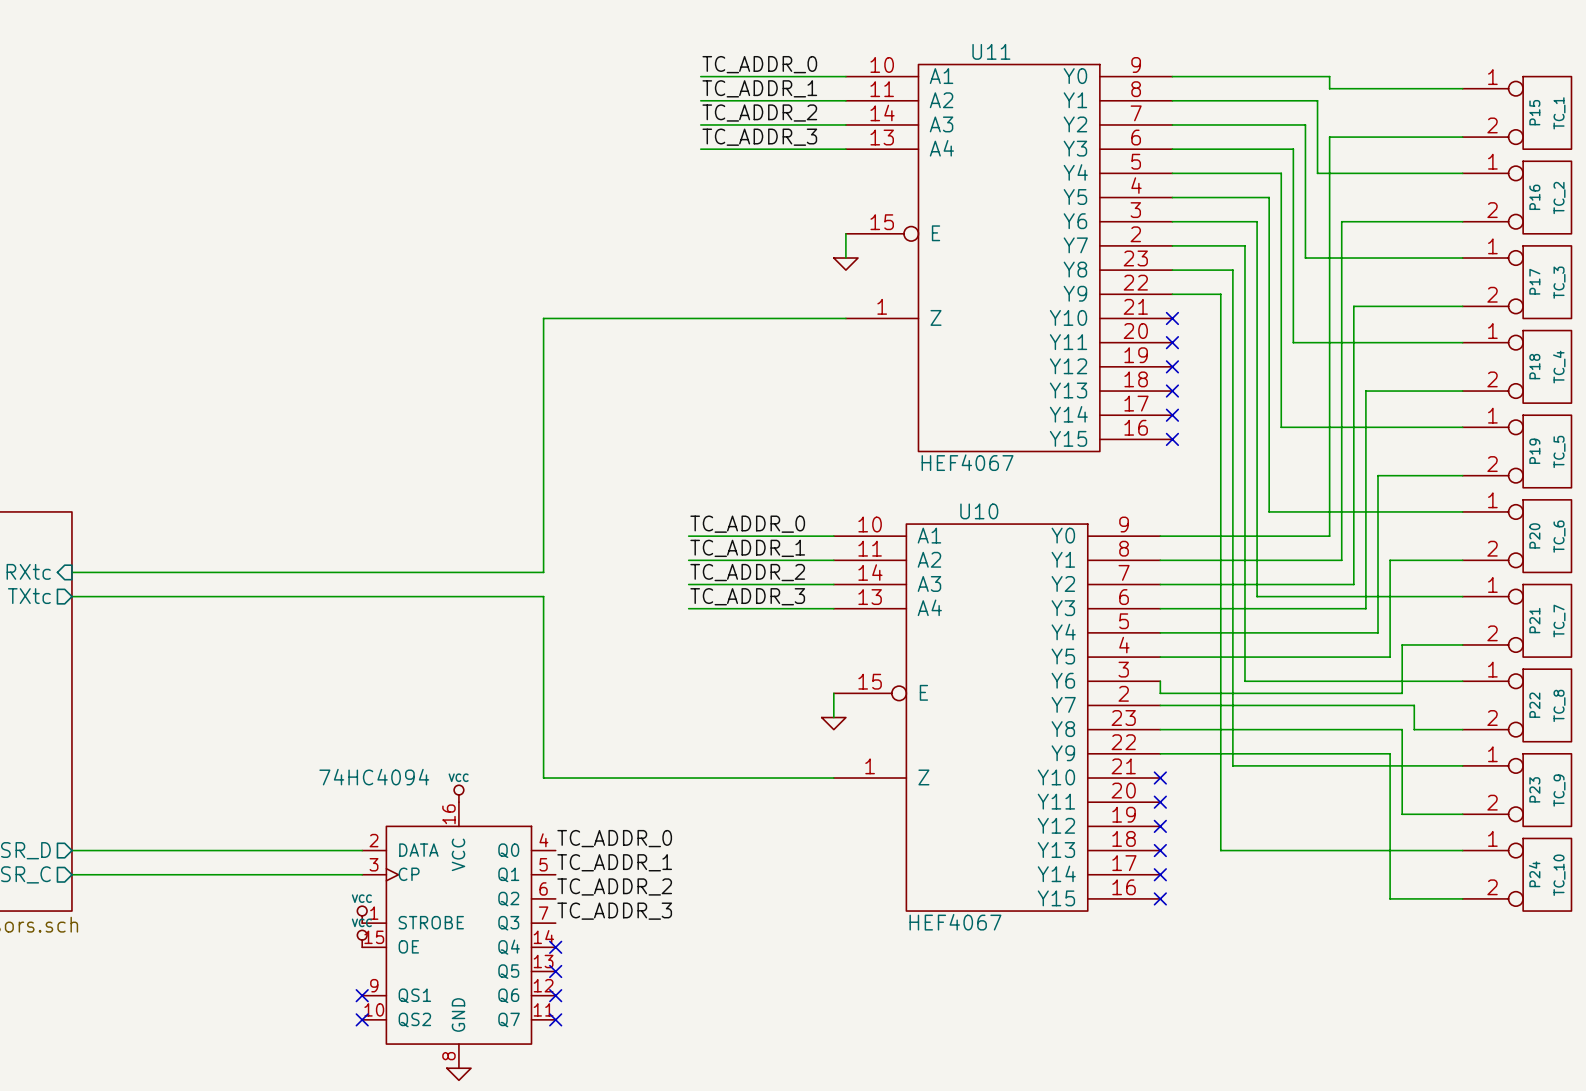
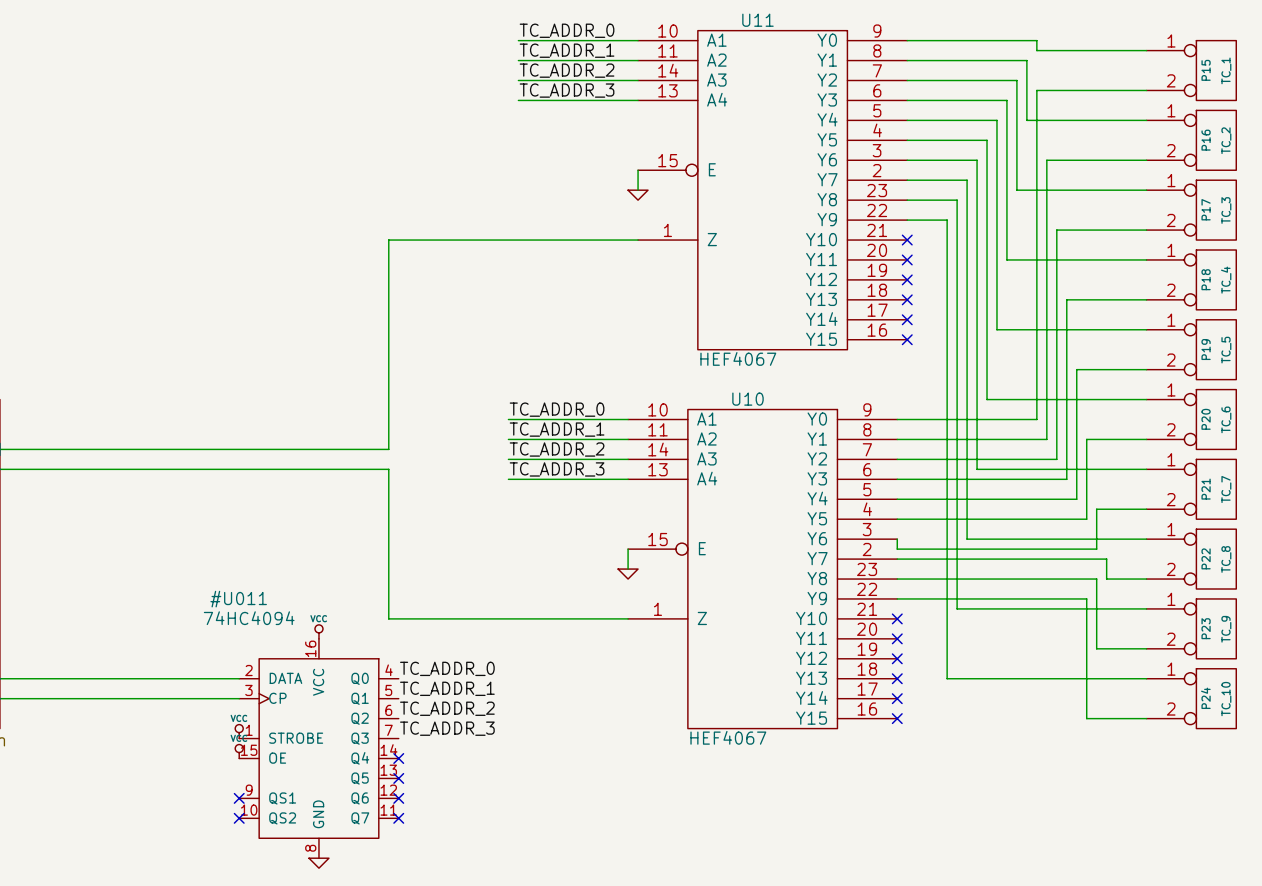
drawing shape: [319, 768, 556, 1069] -> [203, 590, 399, 859]

